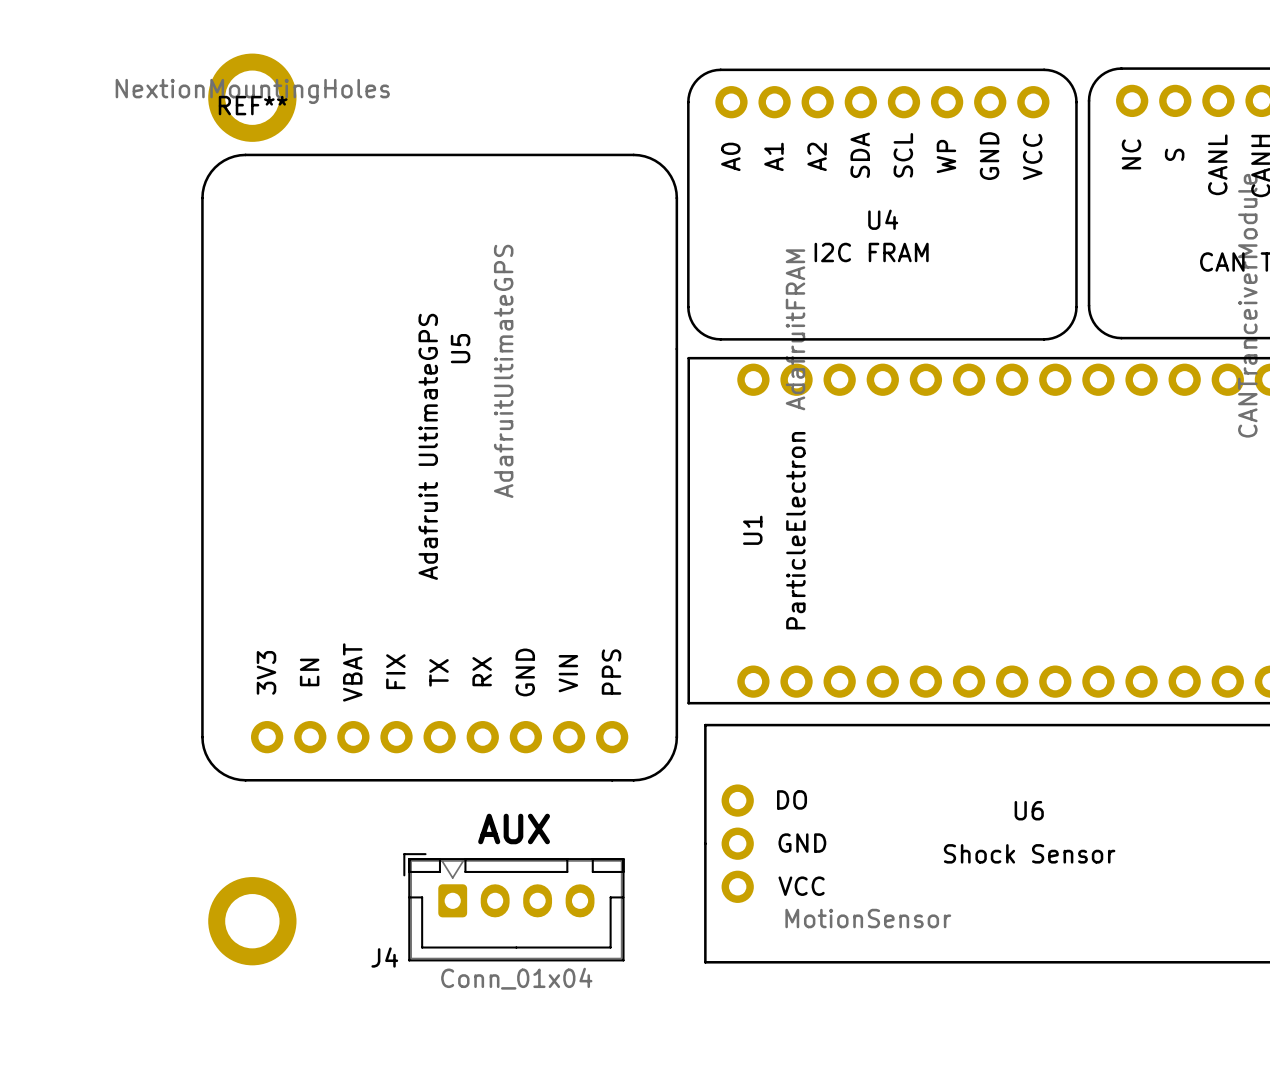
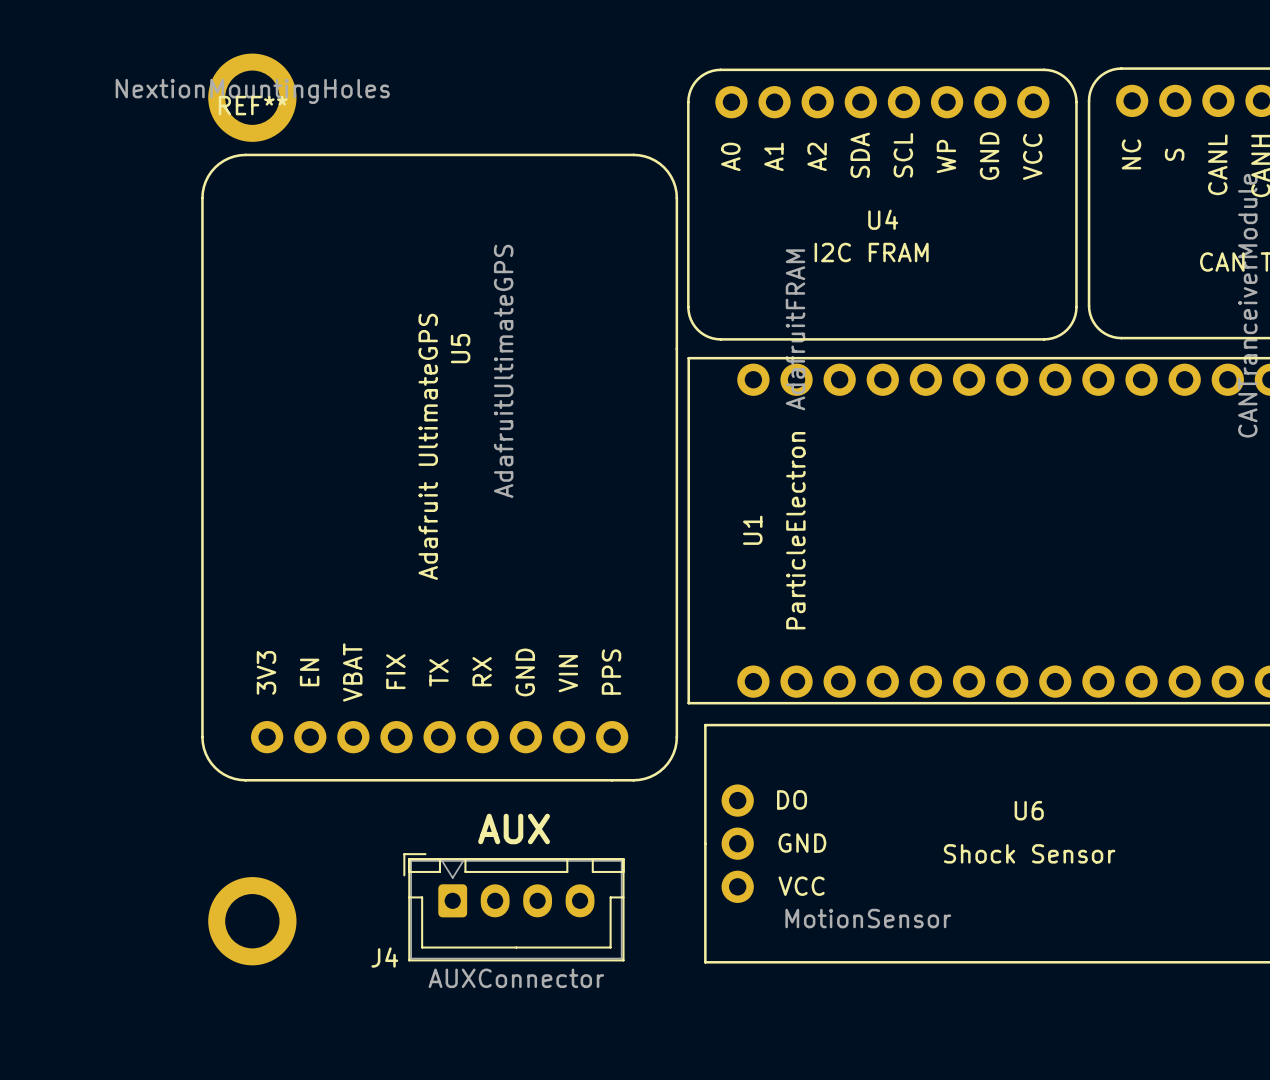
J4 value: Conn_01x04 (516, 978) -> AUXConnector (516, 978)

